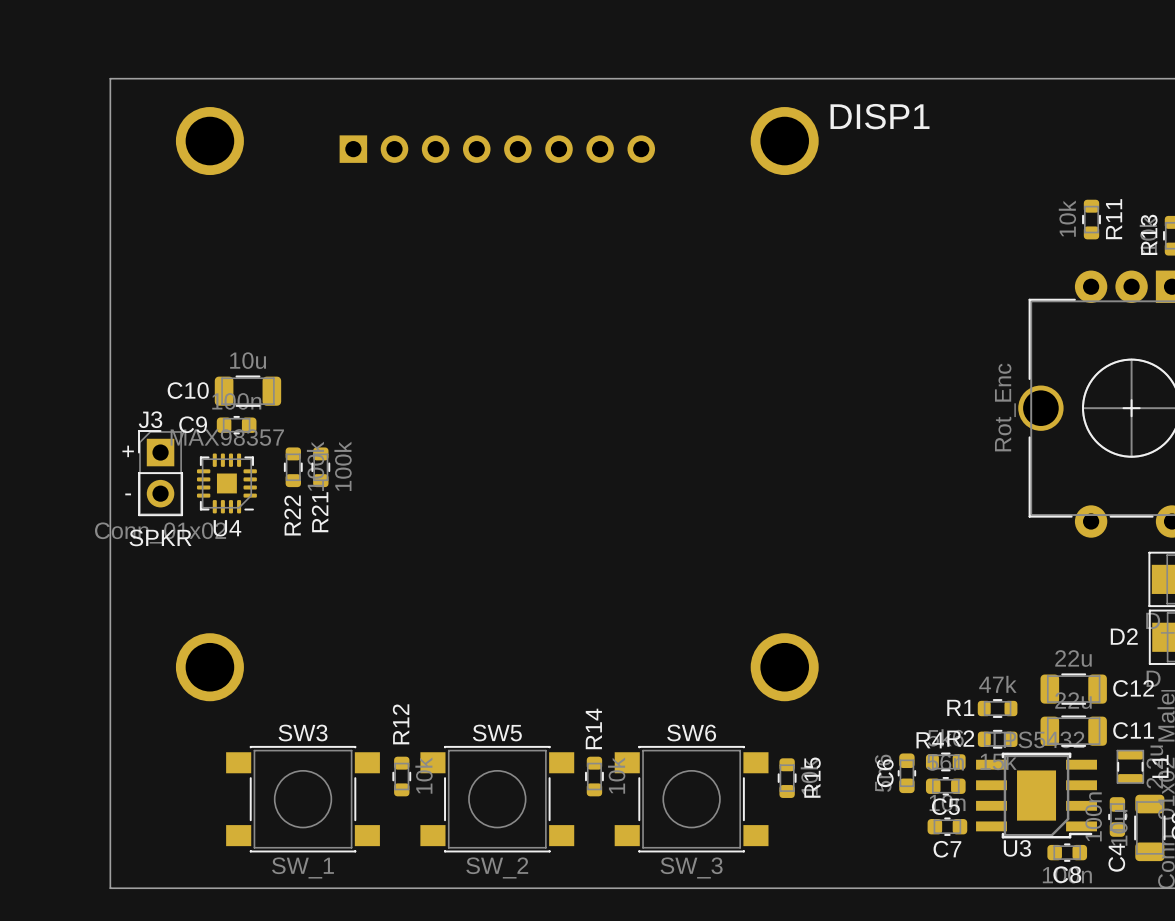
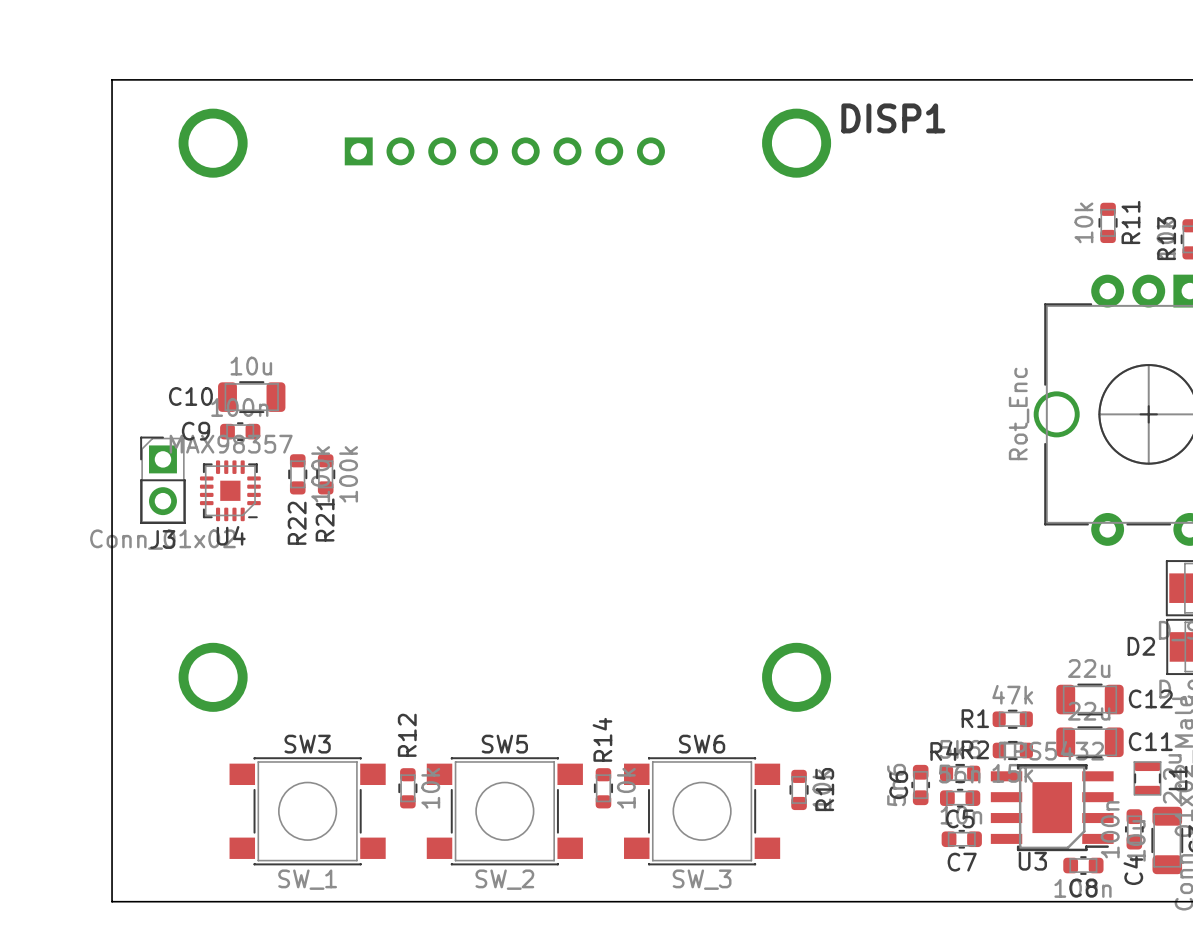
J3 name position: J3 (150, 419) -> J3 (162, 539)
text: + (128, 451) -> none
text: - (128, 494) -> none
text: SPKR (160, 537) -> none

